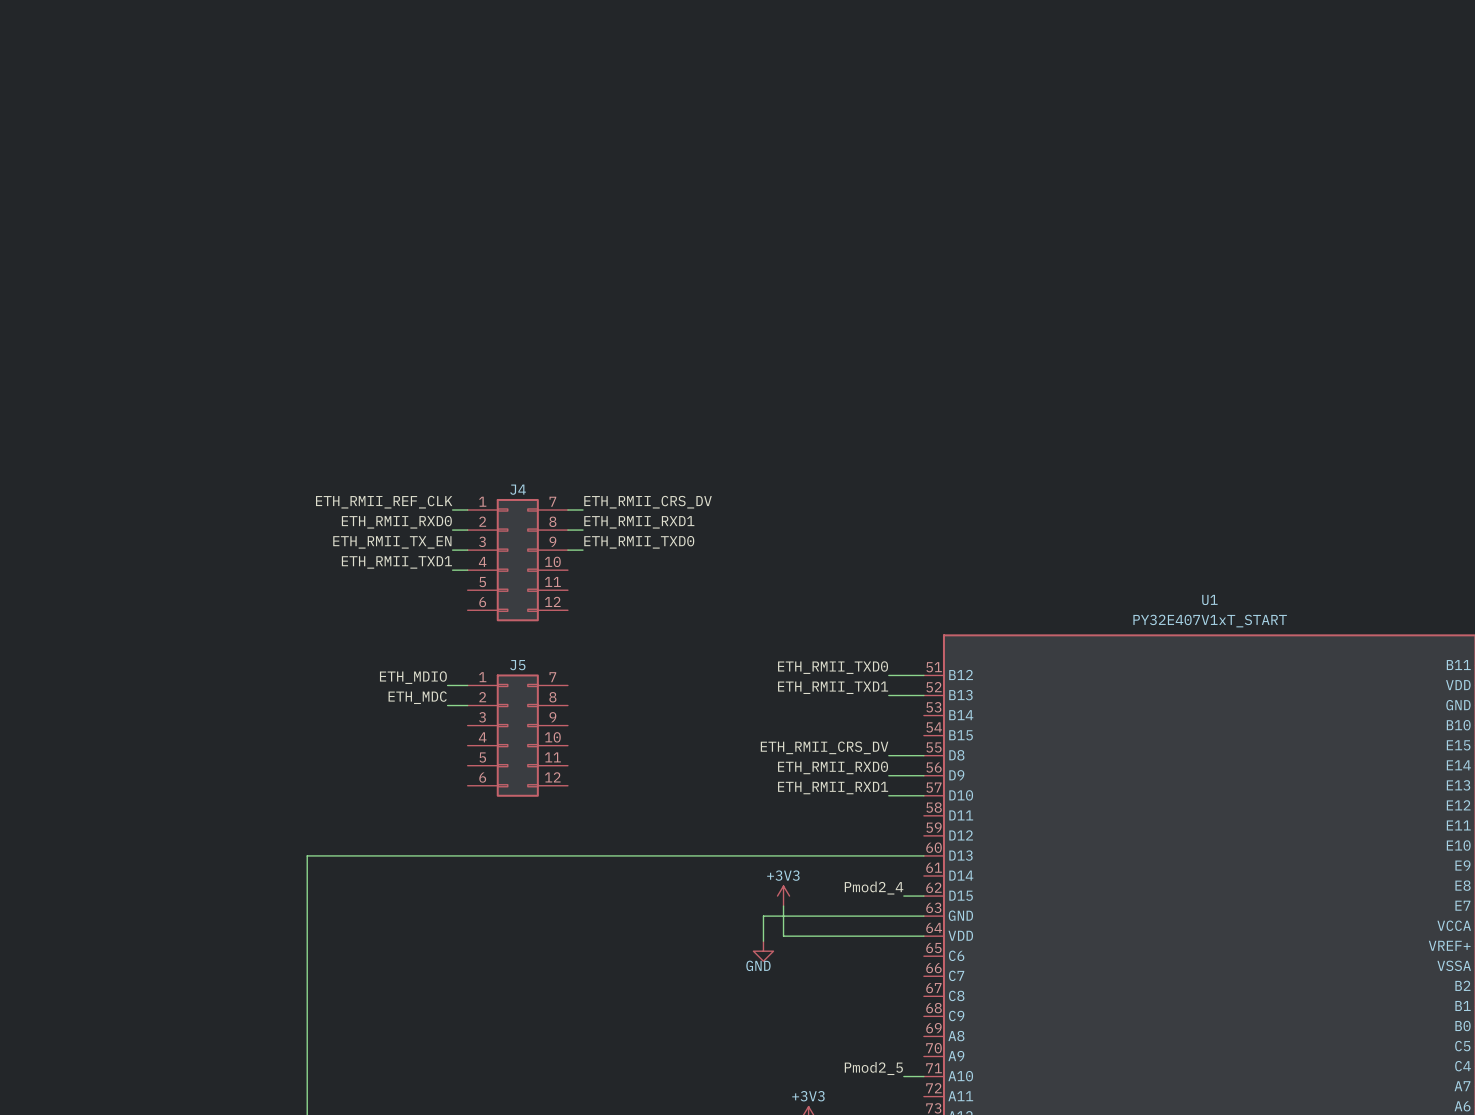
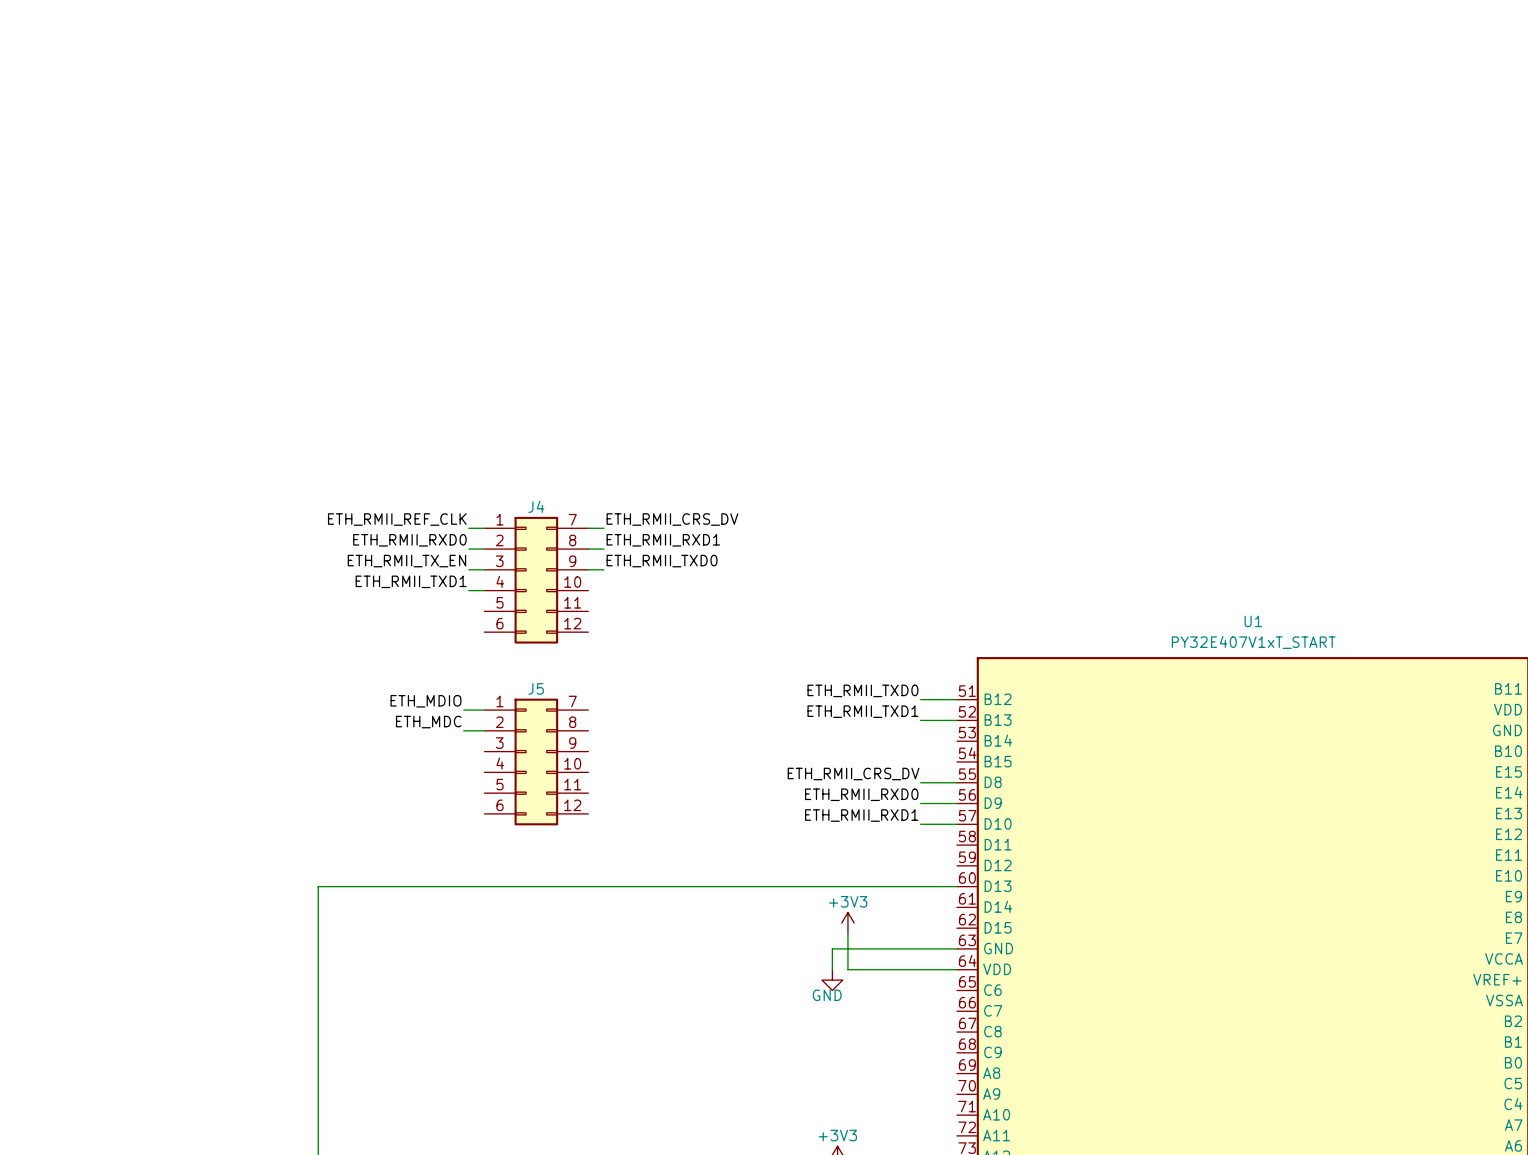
label: Pmod2_4 (874, 888) -> none
power symbol position: +3V3 (783, 896) -> +3V3 (847, 922)
wire: (903, 896) (923, 896) -> none
wire: (783, 906) (783, 936) (818, 936) -> (847, 933) (847, 969)
wire: (803, 916) (763, 916) (763, 941) -> (832, 948) (832, 969)
power symbol position: GND (763, 951) -> GND (832, 980)
label: Pmod2_5 (873, 1068) -> none
wire: (903, 1076) (923, 1076) -> none

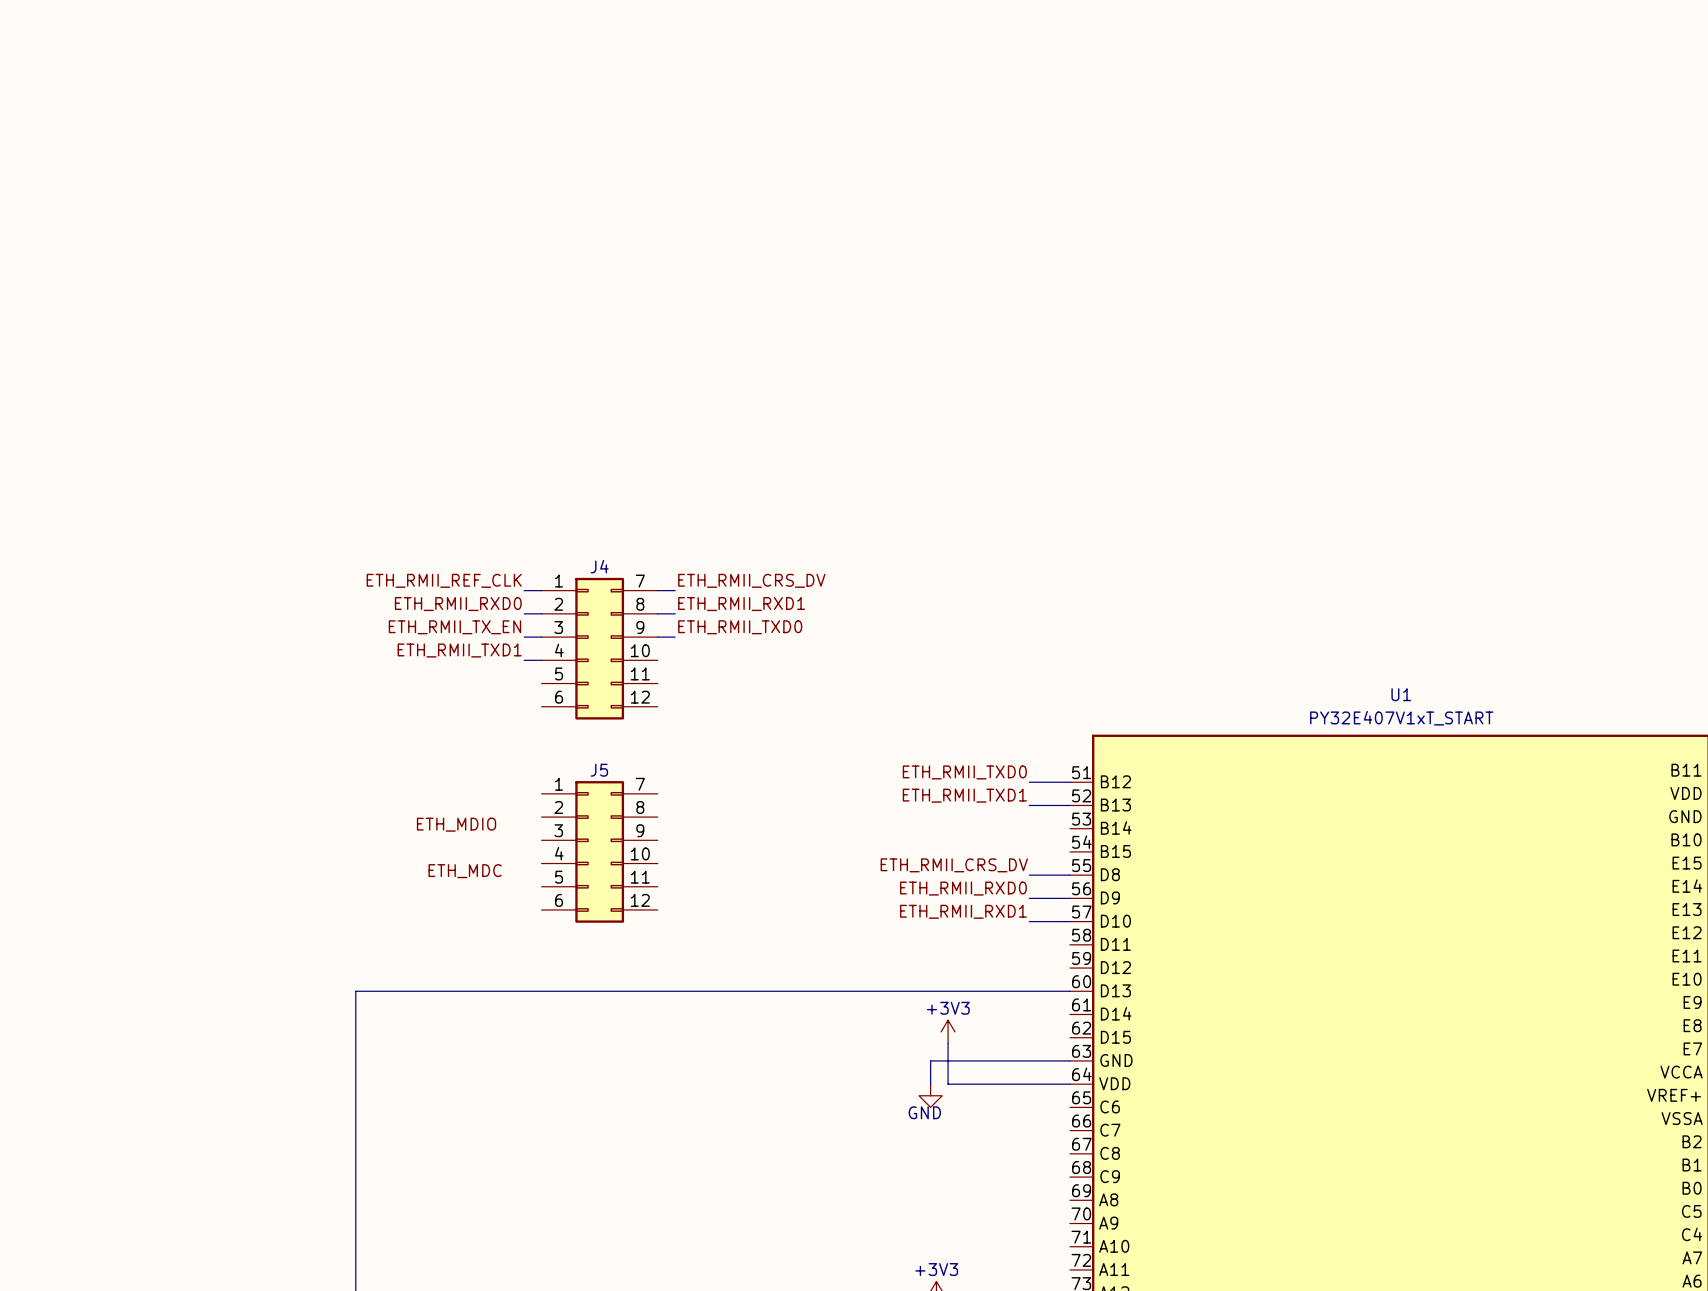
label position: ETH_MDIO (425, 701) -> ETH_MDIO (456, 824)
wire: (463, 710) (484, 710) -> none
label position: ETH_MDC (428, 722) -> ETH_MDC (465, 871)
wire: (463, 730) (484, 730) -> none

